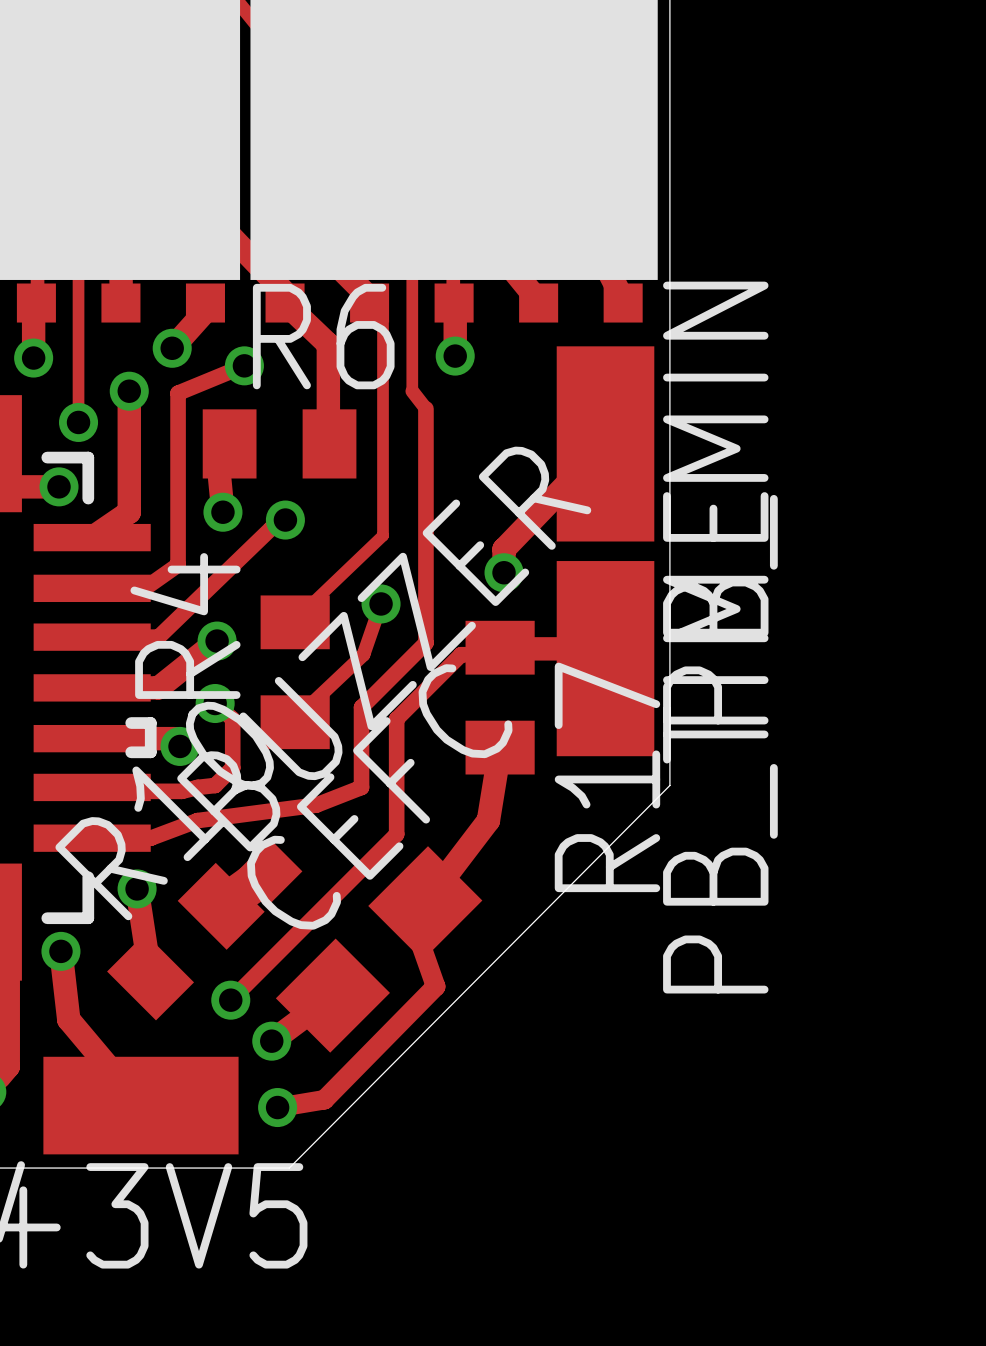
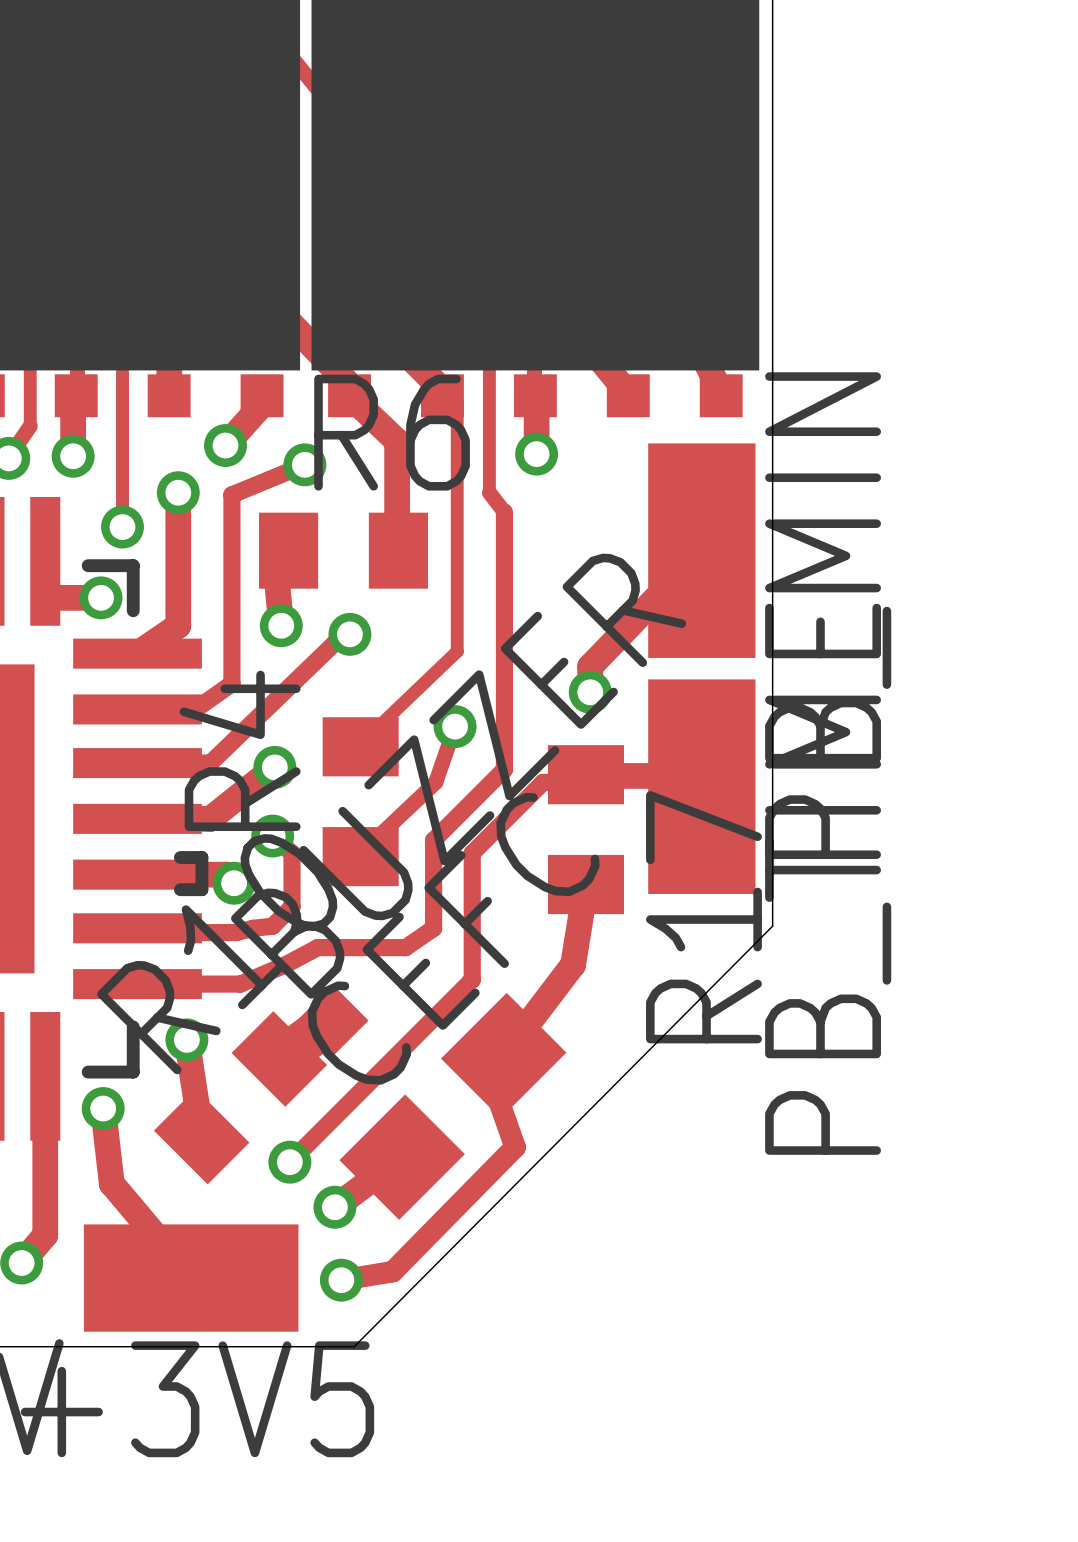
track: (361, 787) (316, 805) (197, 820) (150, 838) -> (433, 928) (405, 947) (317, 947) (285, 964) (240, 984) (201, 984)

